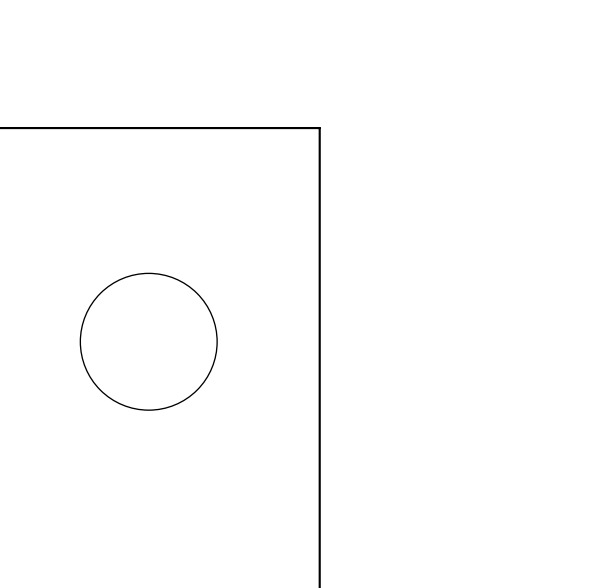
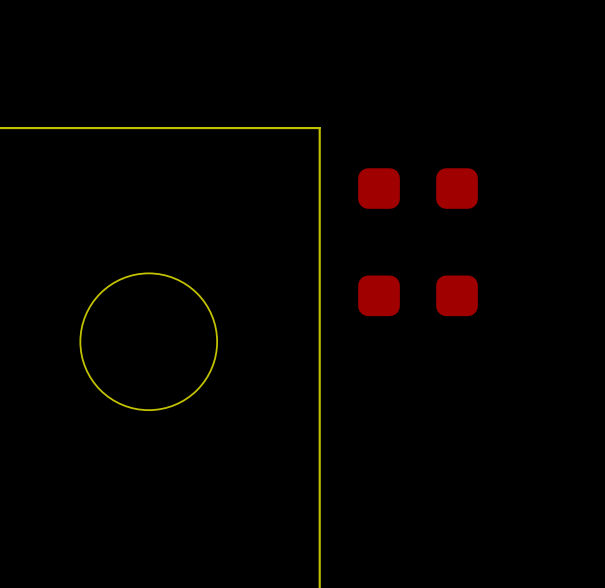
part: none -> (418, 188)
part: none -> (418, 295)

